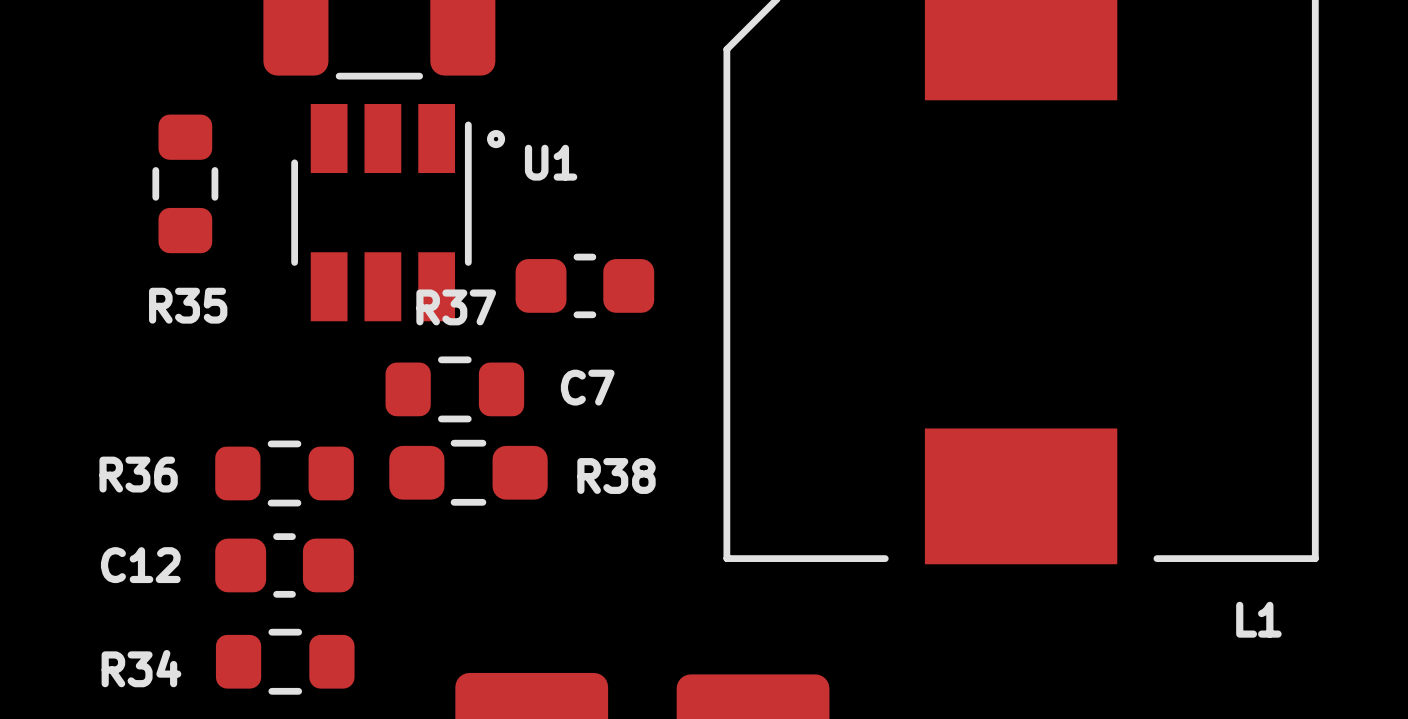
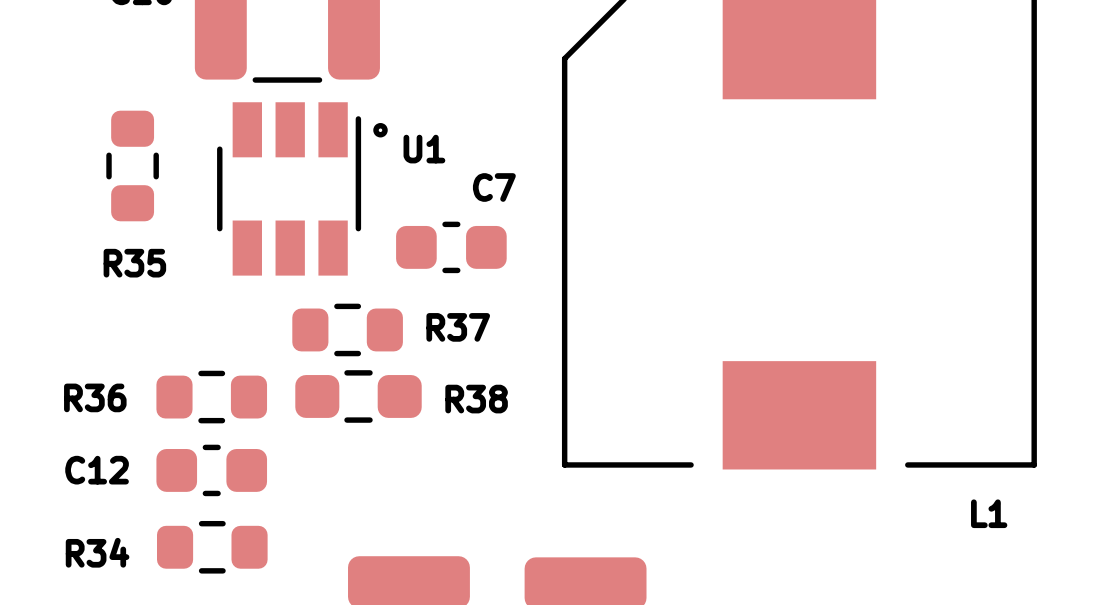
R37 name position: R37 (456, 307) -> R37 (458, 327)
C7 name position: C7 (587, 387) -> C7 (494, 187)

